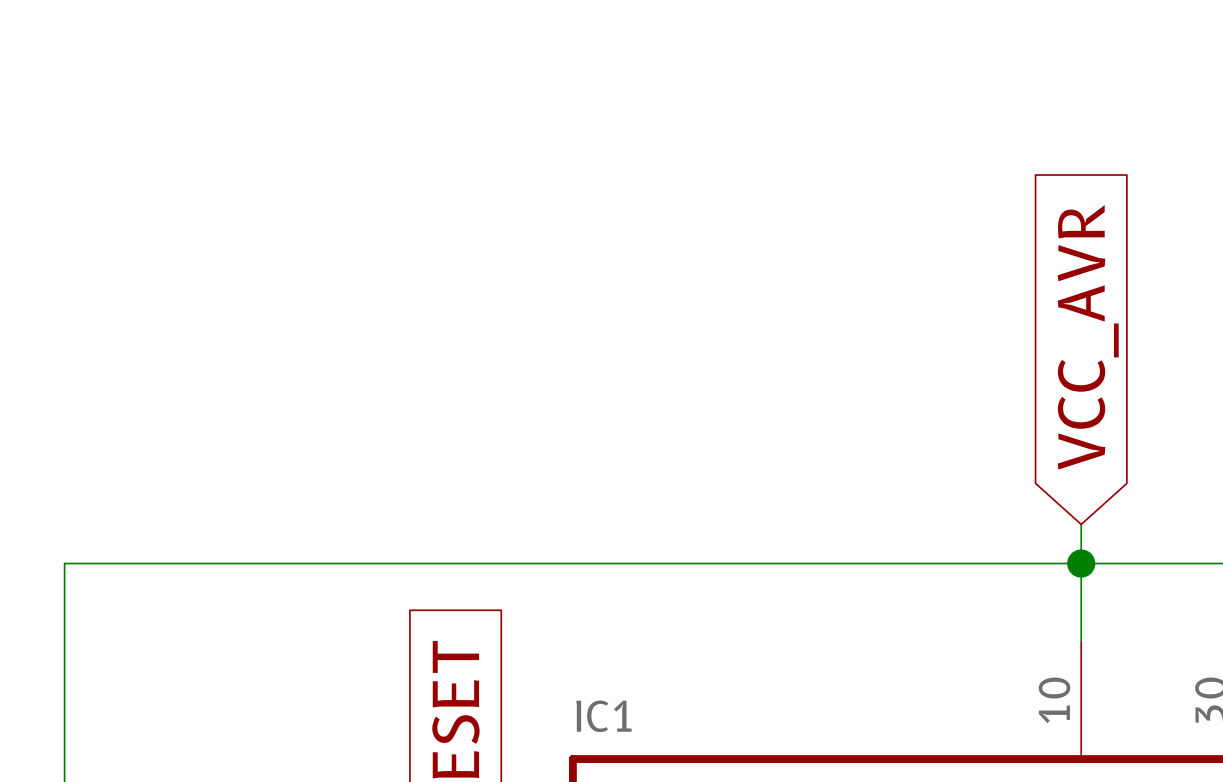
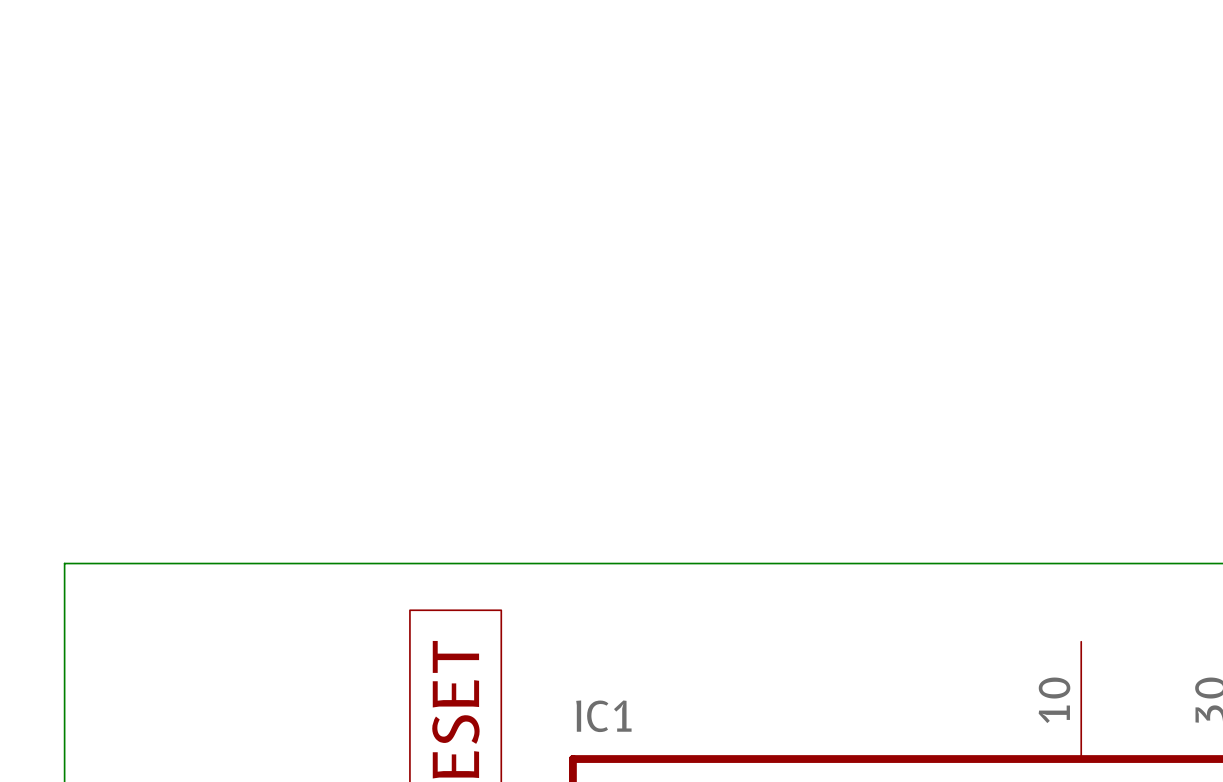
global label: VCC_AVR (1088, 337) -> none
wire: (1081, 524) (1081, 641) -> none
junction: (1081, 563) -> none

